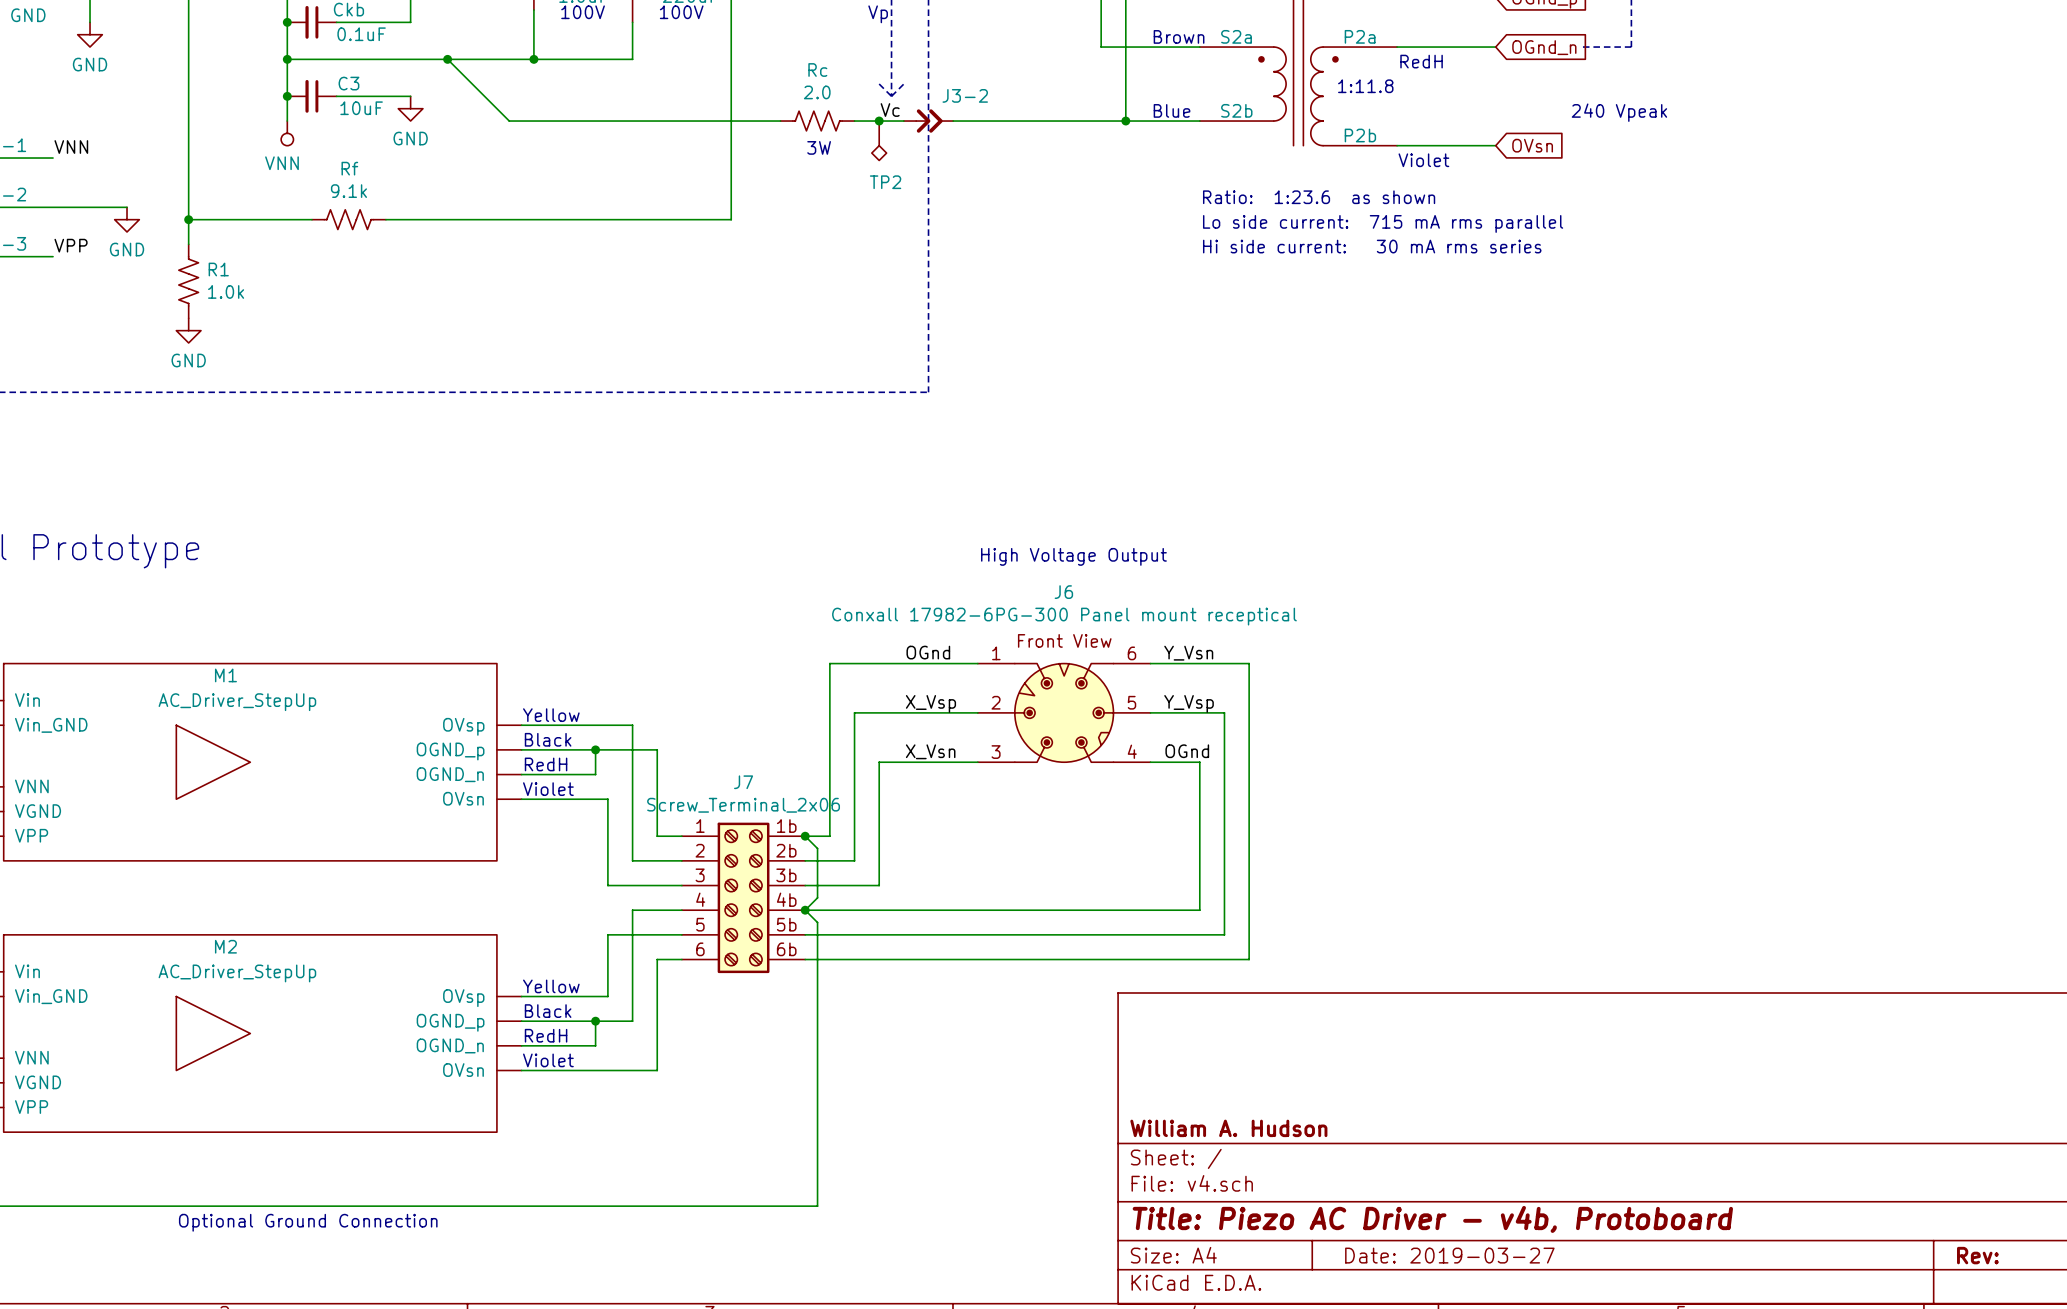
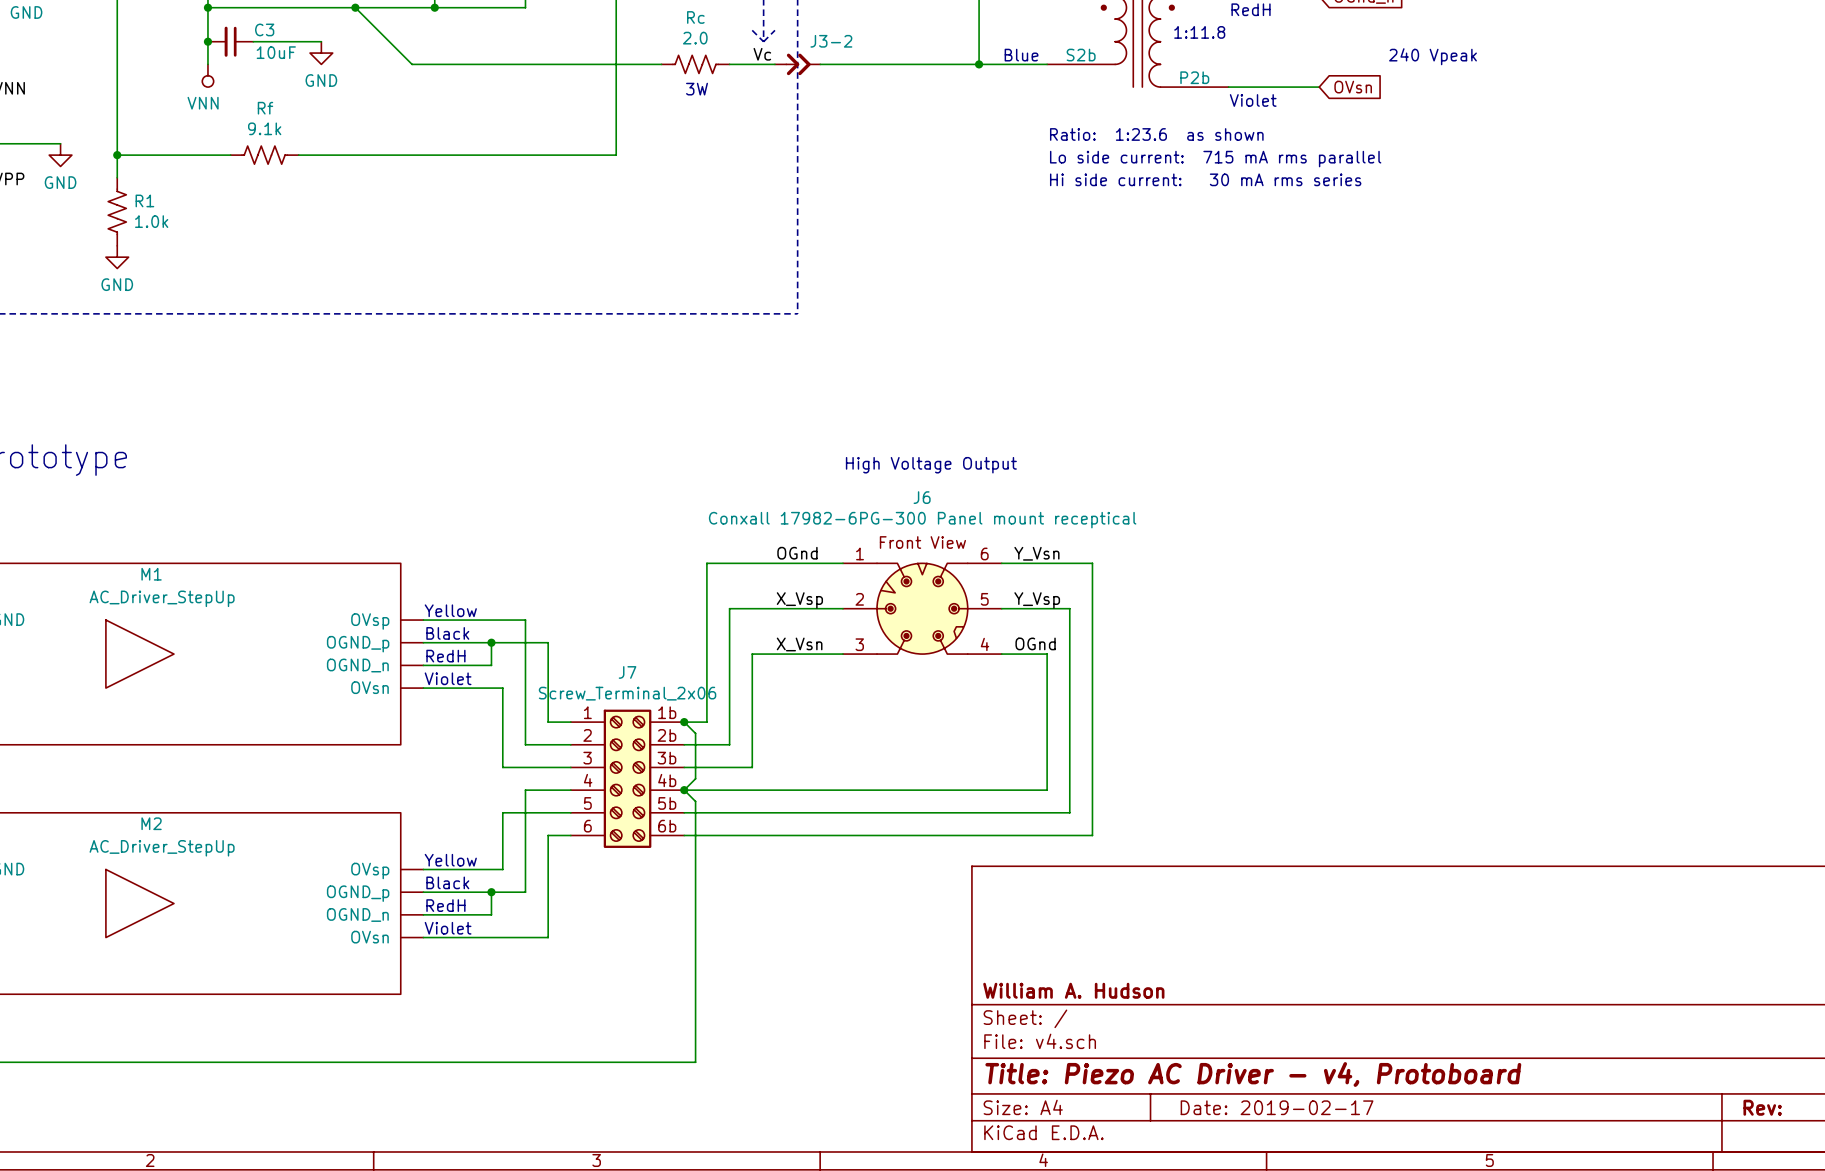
junction: (879, 121) -> none
TP2: (879, 140) -> none
title block: Title: Piezo AC Driver - v4b, Protoboard (1432, 1219) -> Title: Piezo AC Driver - v4, Protoboard (1253, 1074)
text: Optional Ground Connection (308, 1222) -> none
title block: Date: 2019-03-27 (1449, 1255) -> Date: 2019-02-17 (1277, 1107)

